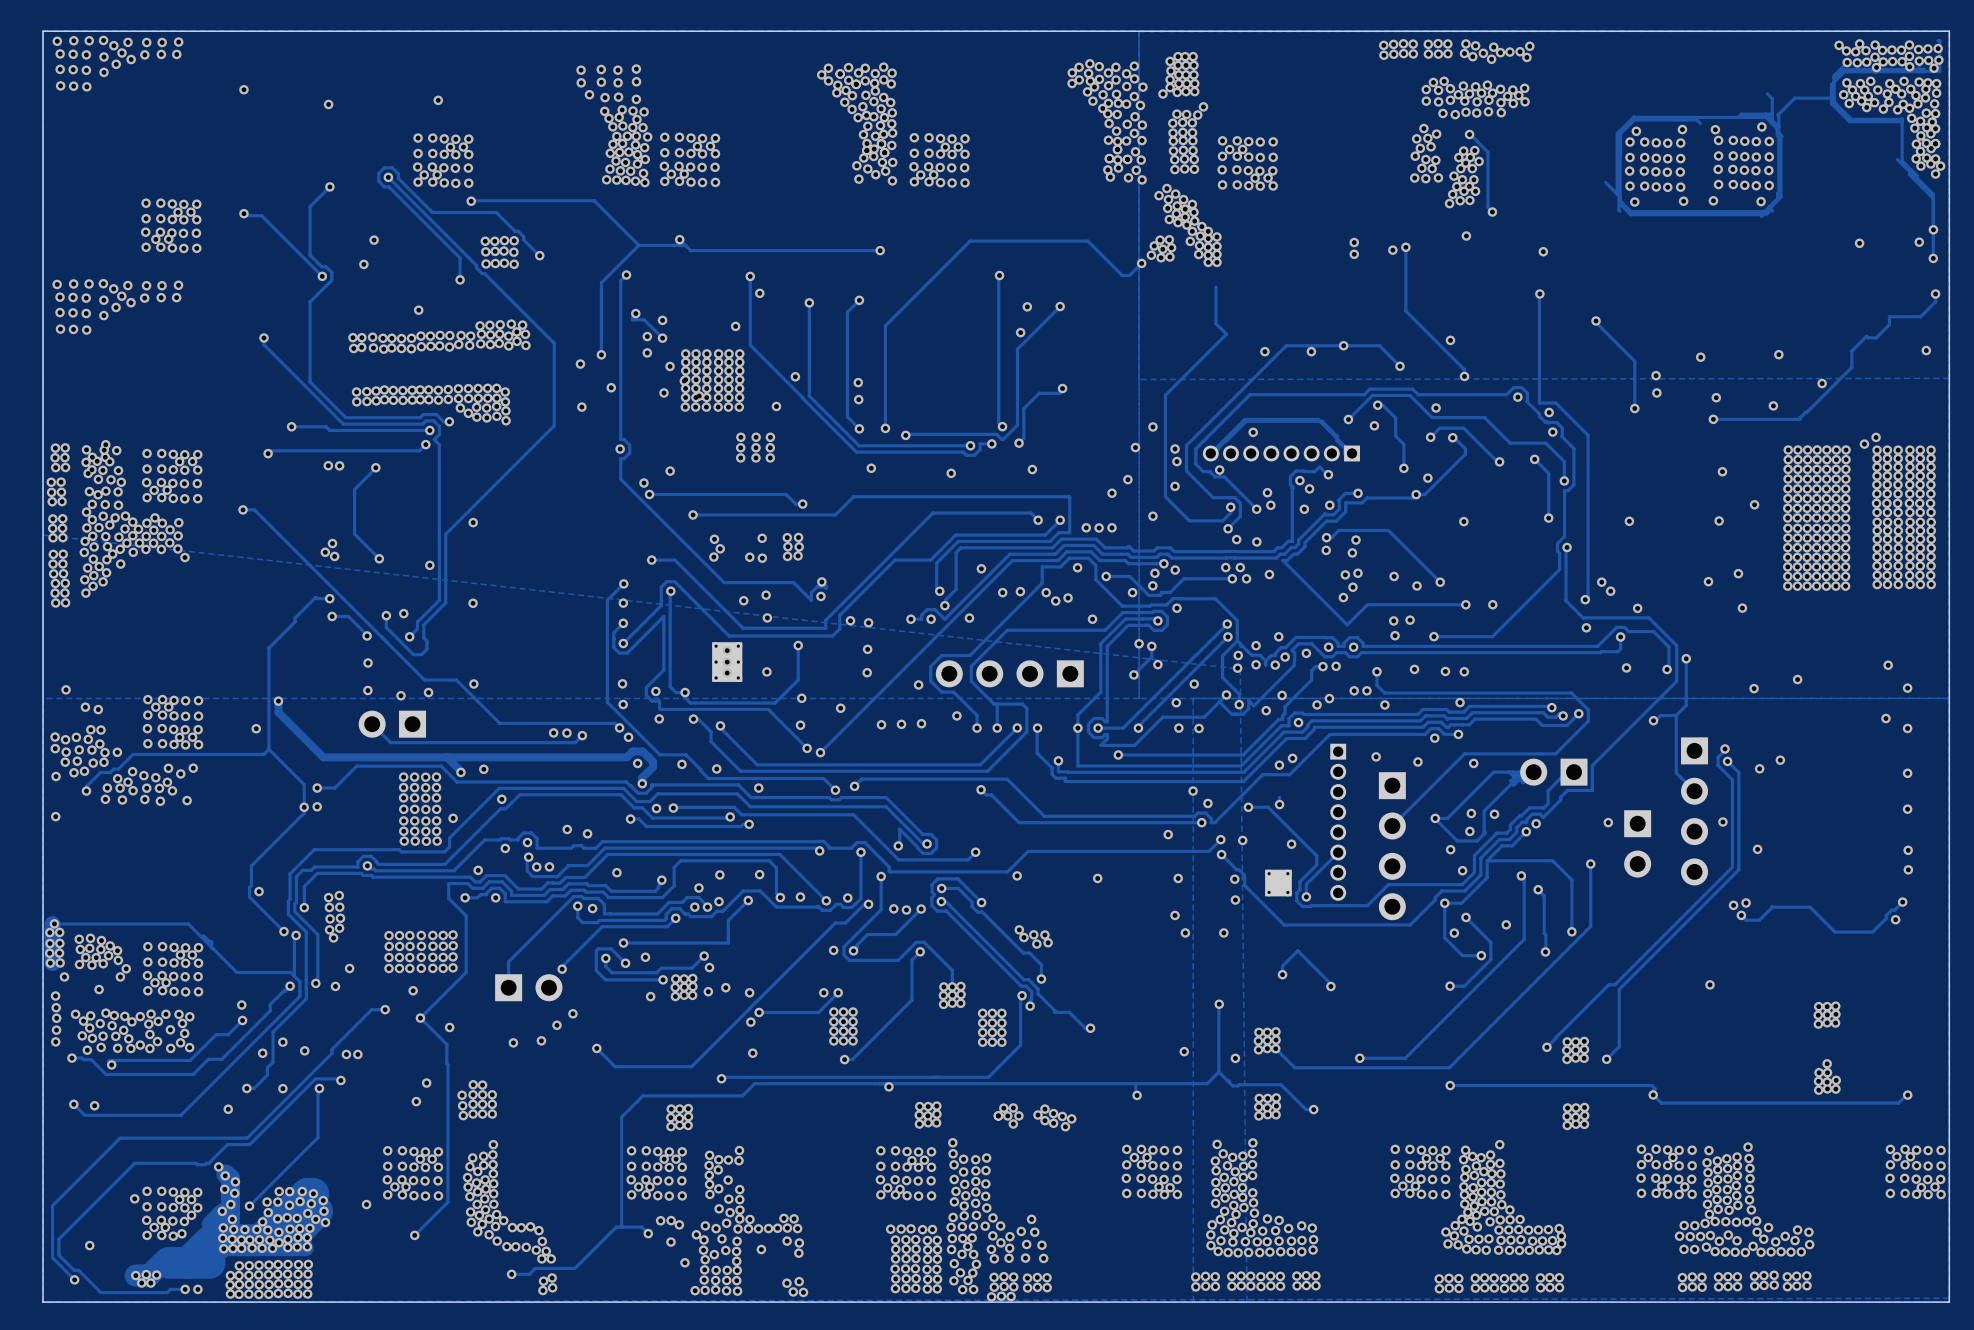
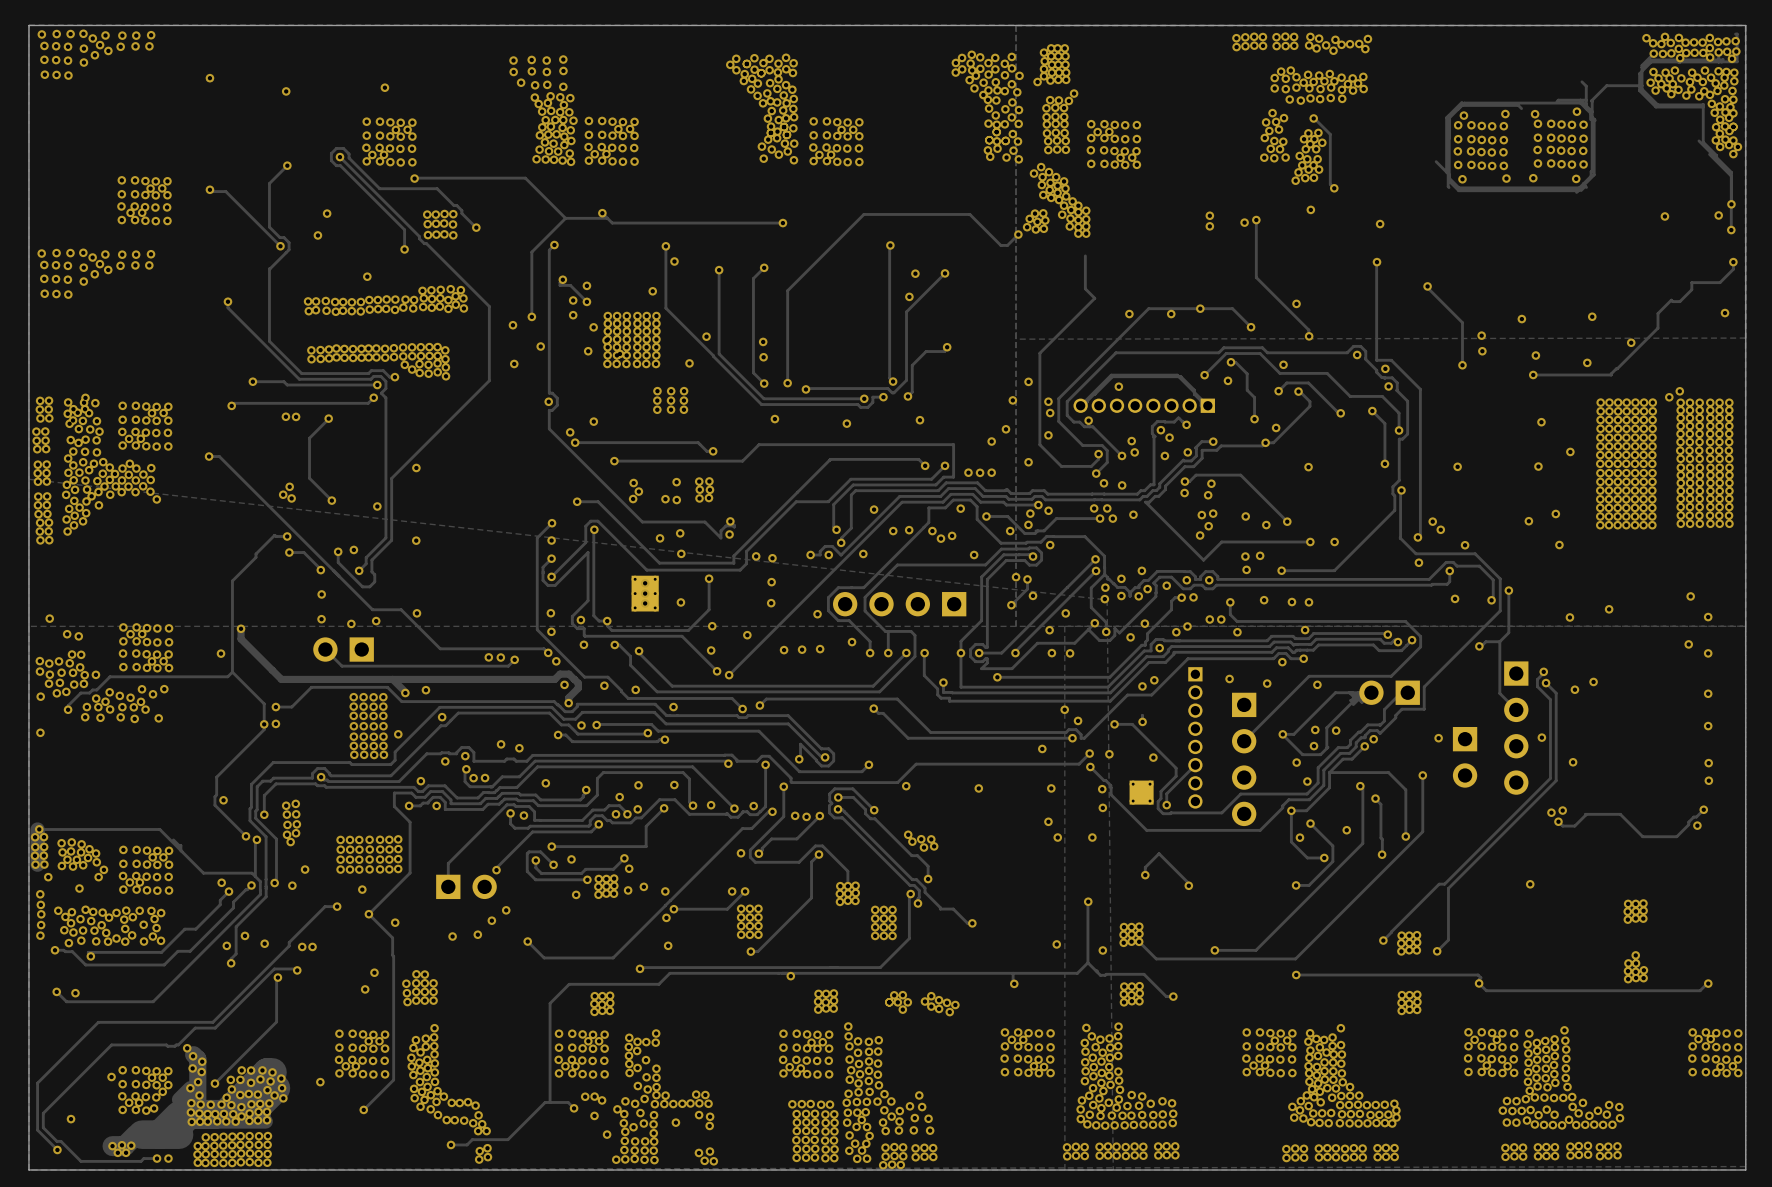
via: none -> (221, 882)
track: none -> (228, 891) (220, 900) (220, 904) (208, 916)
via: none -> (228, 891)
via: (241, 1005) -> none
via: (242, 1020) -> none
track: (267, 1072) (267, 1075) (254, 1088) (246, 1088) -> none
via: none -> (231, 963)
via: (246, 1088) -> none
via: (282, 1088) -> none
via: (228, 1109) -> none

